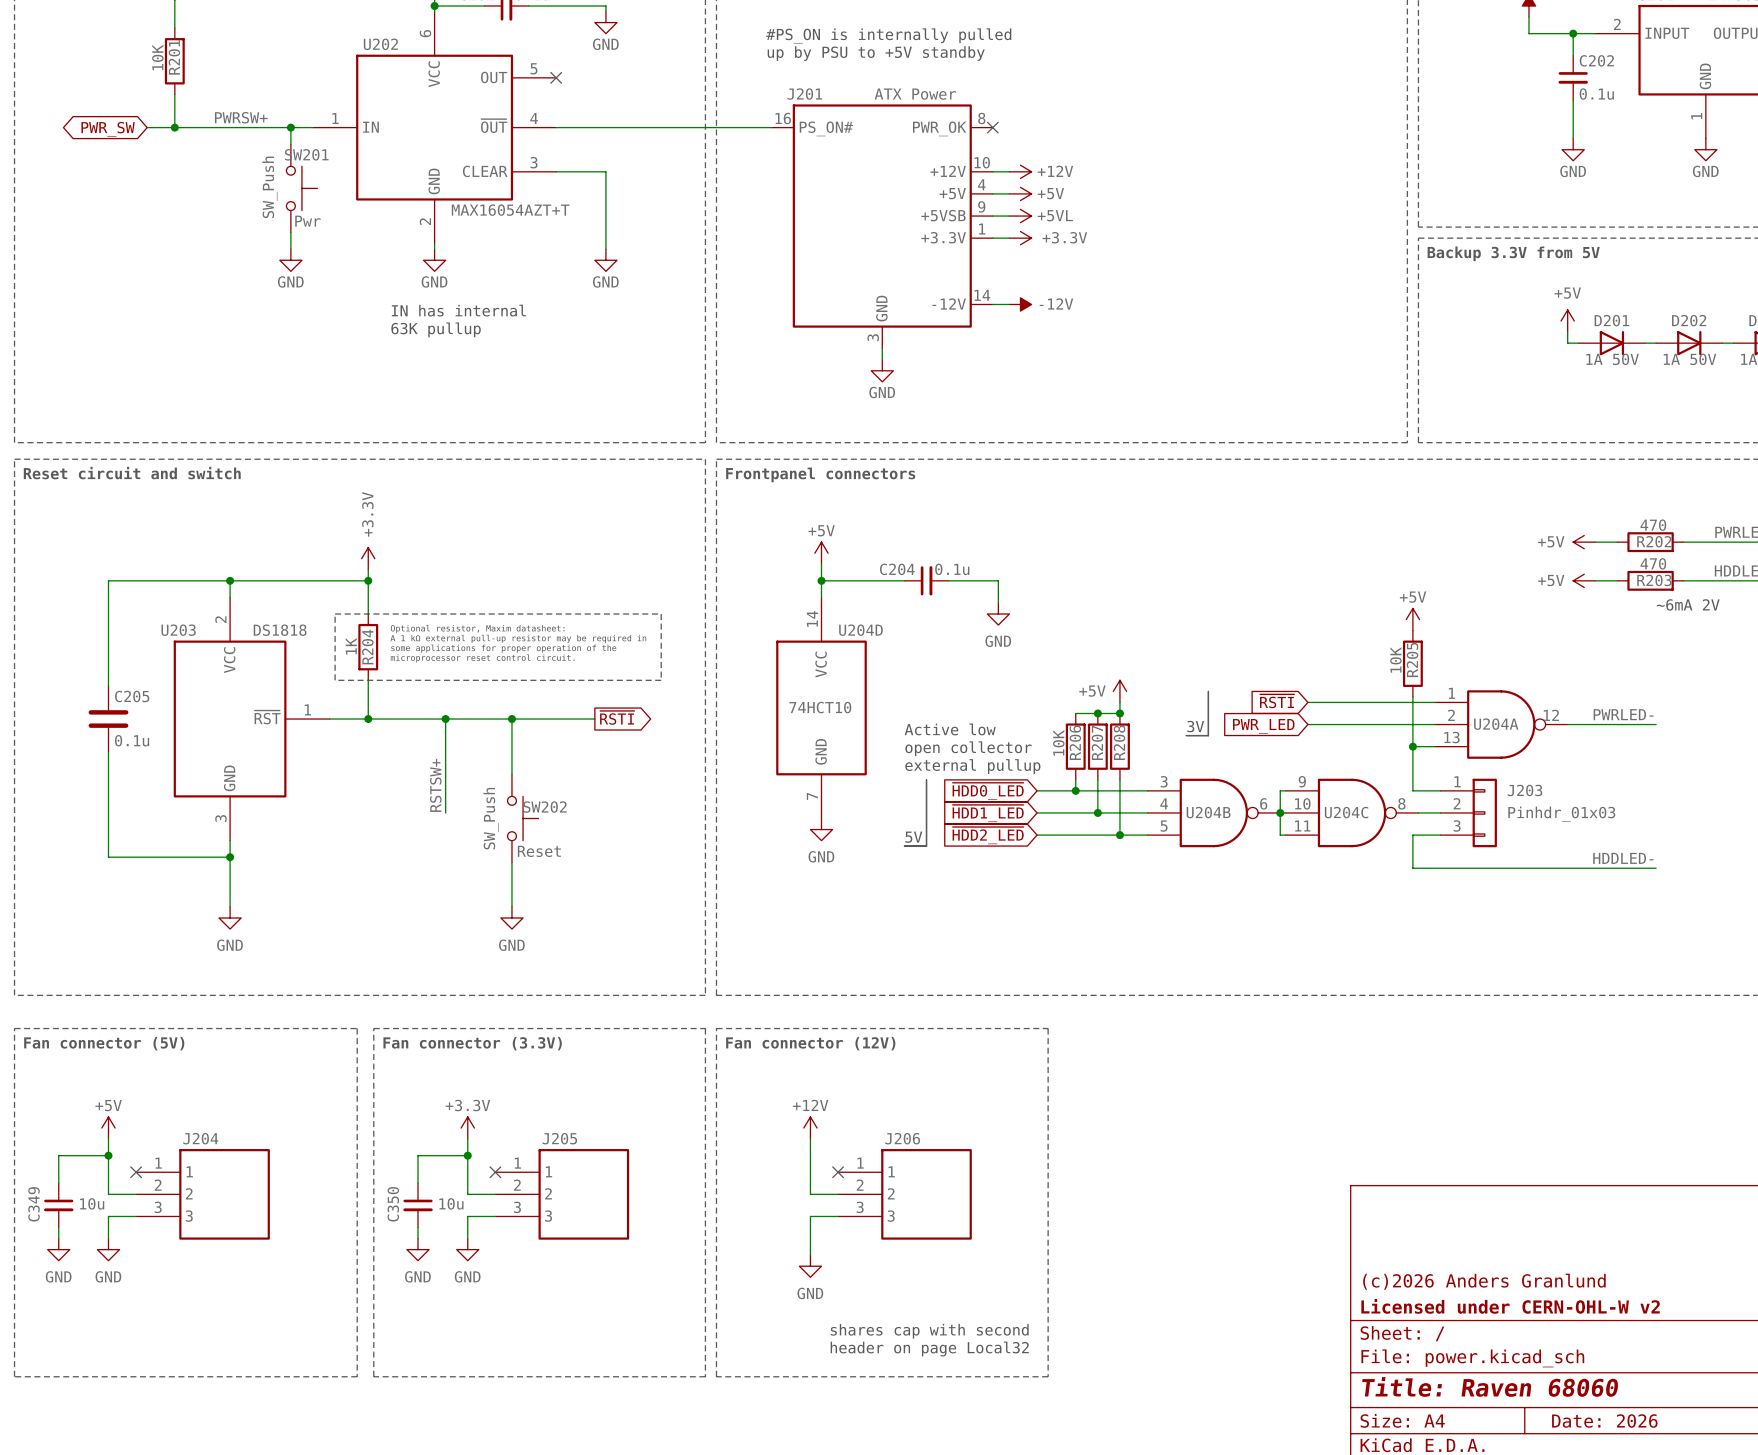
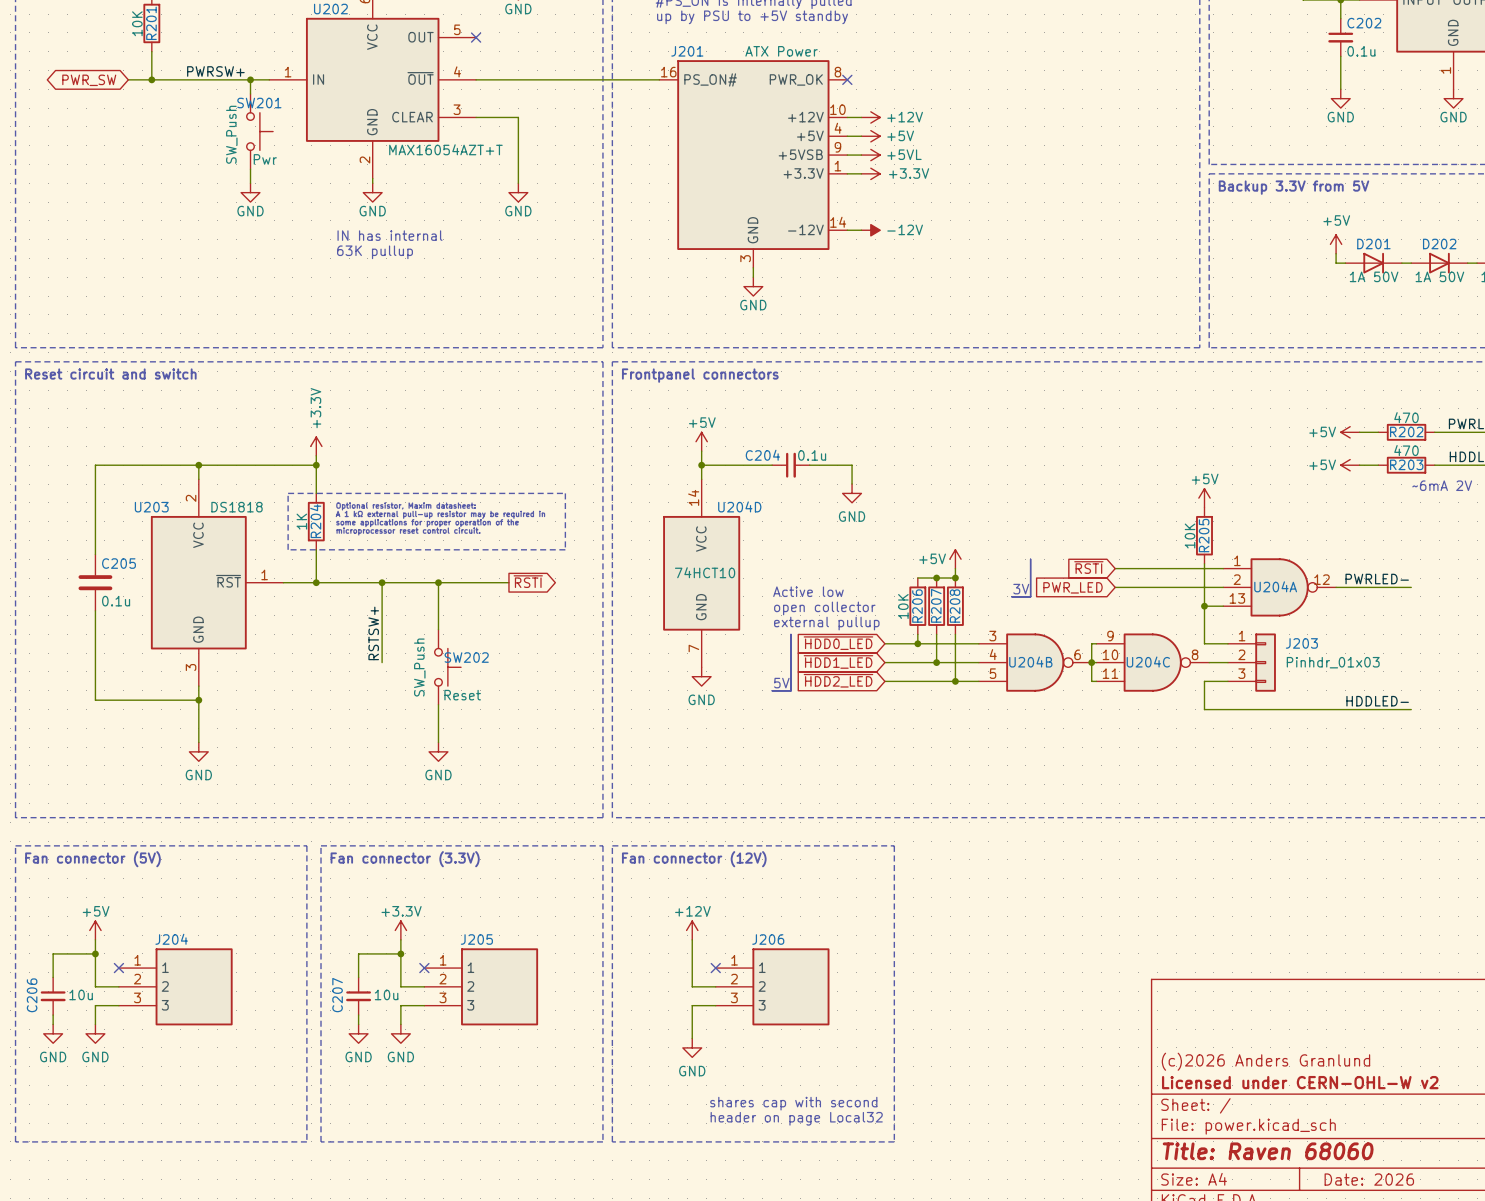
C349 name: C349 (34, 1204) -> C206 (32, 995)
C350 name: C350 (393, 1204) -> C207 (337, 995)

